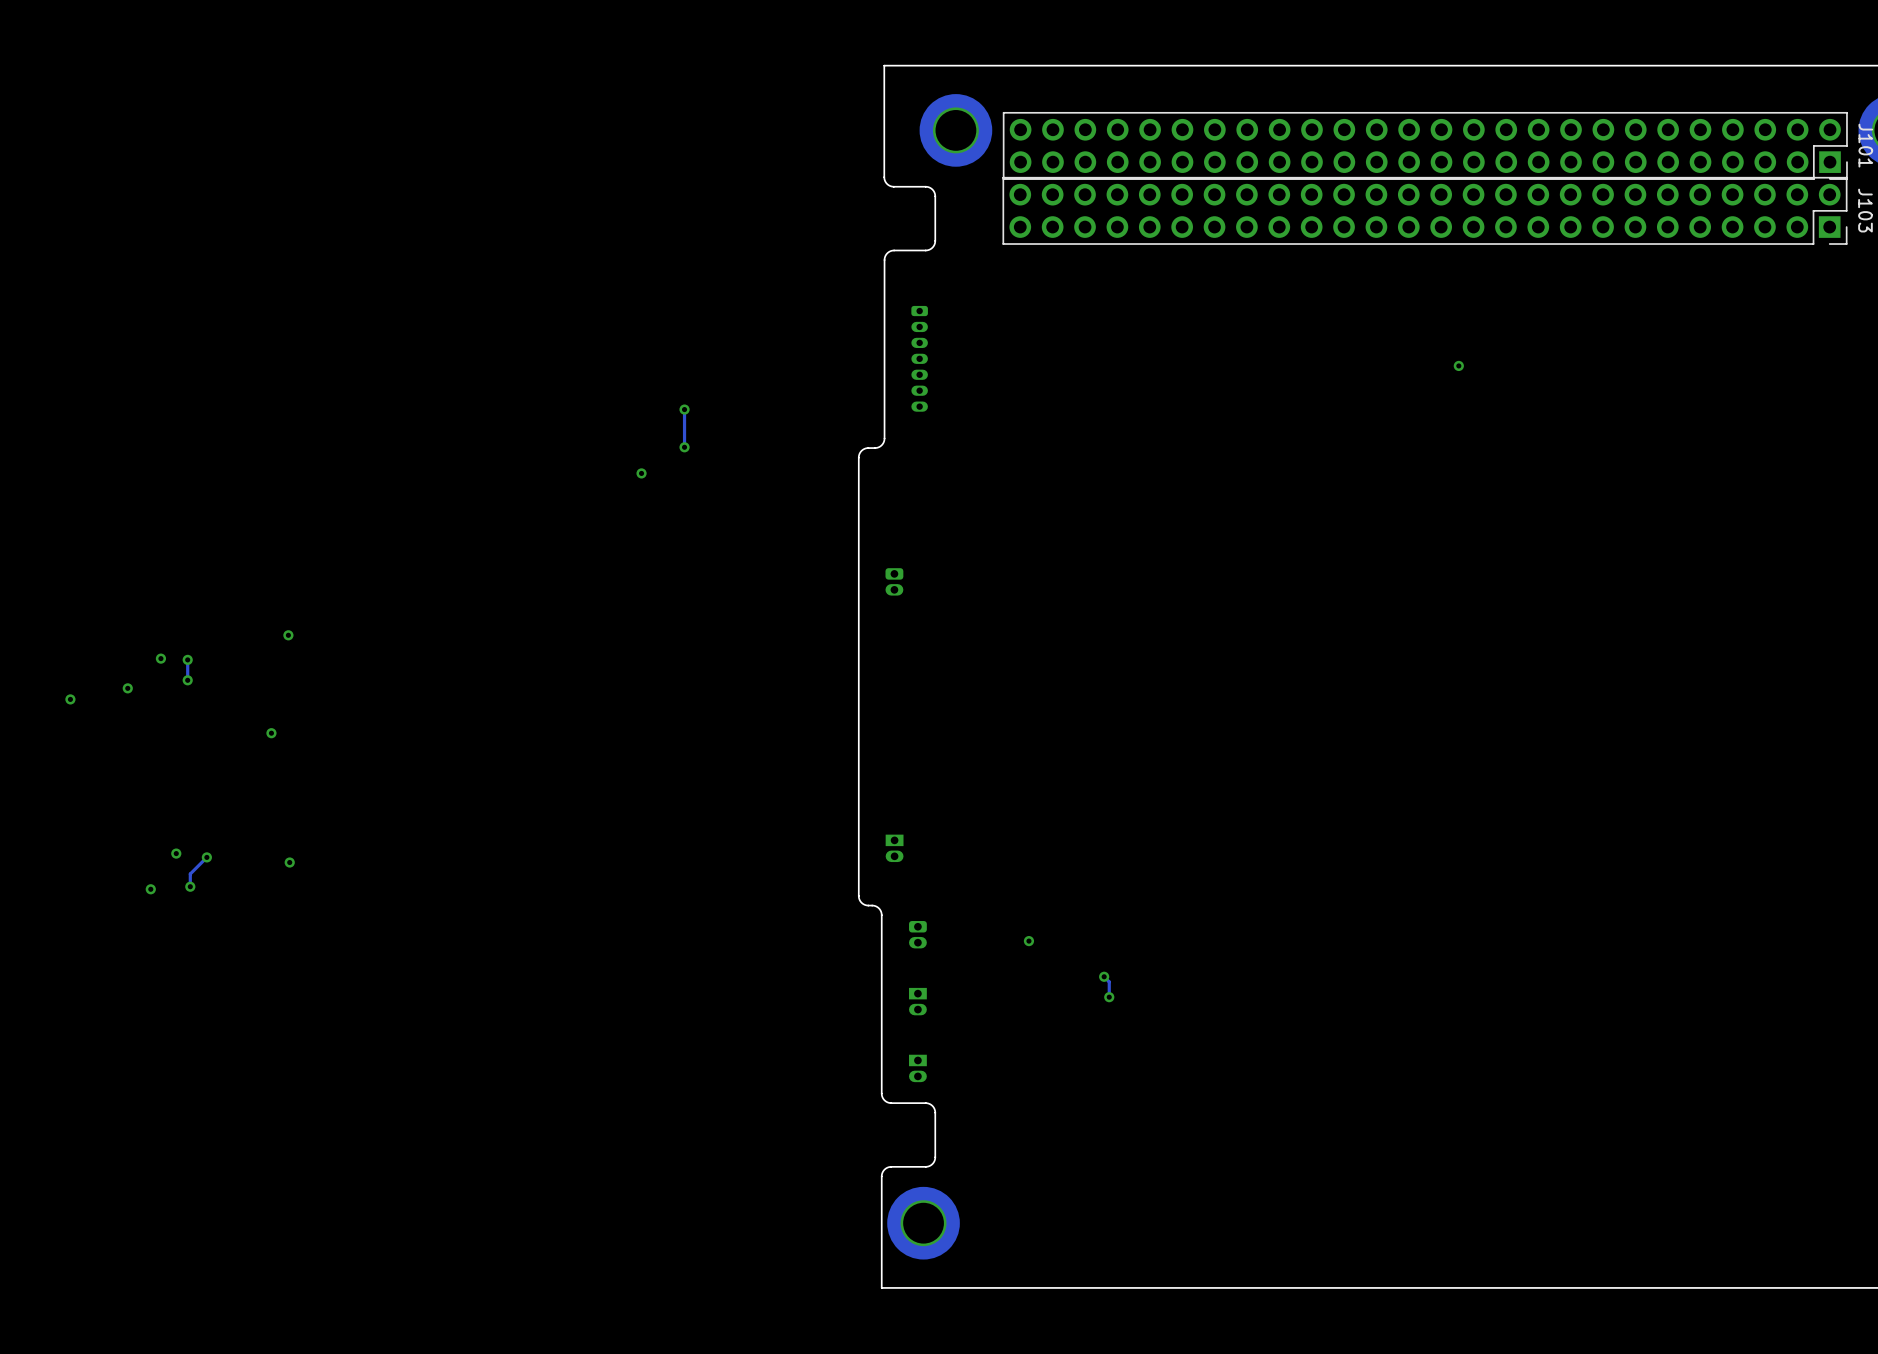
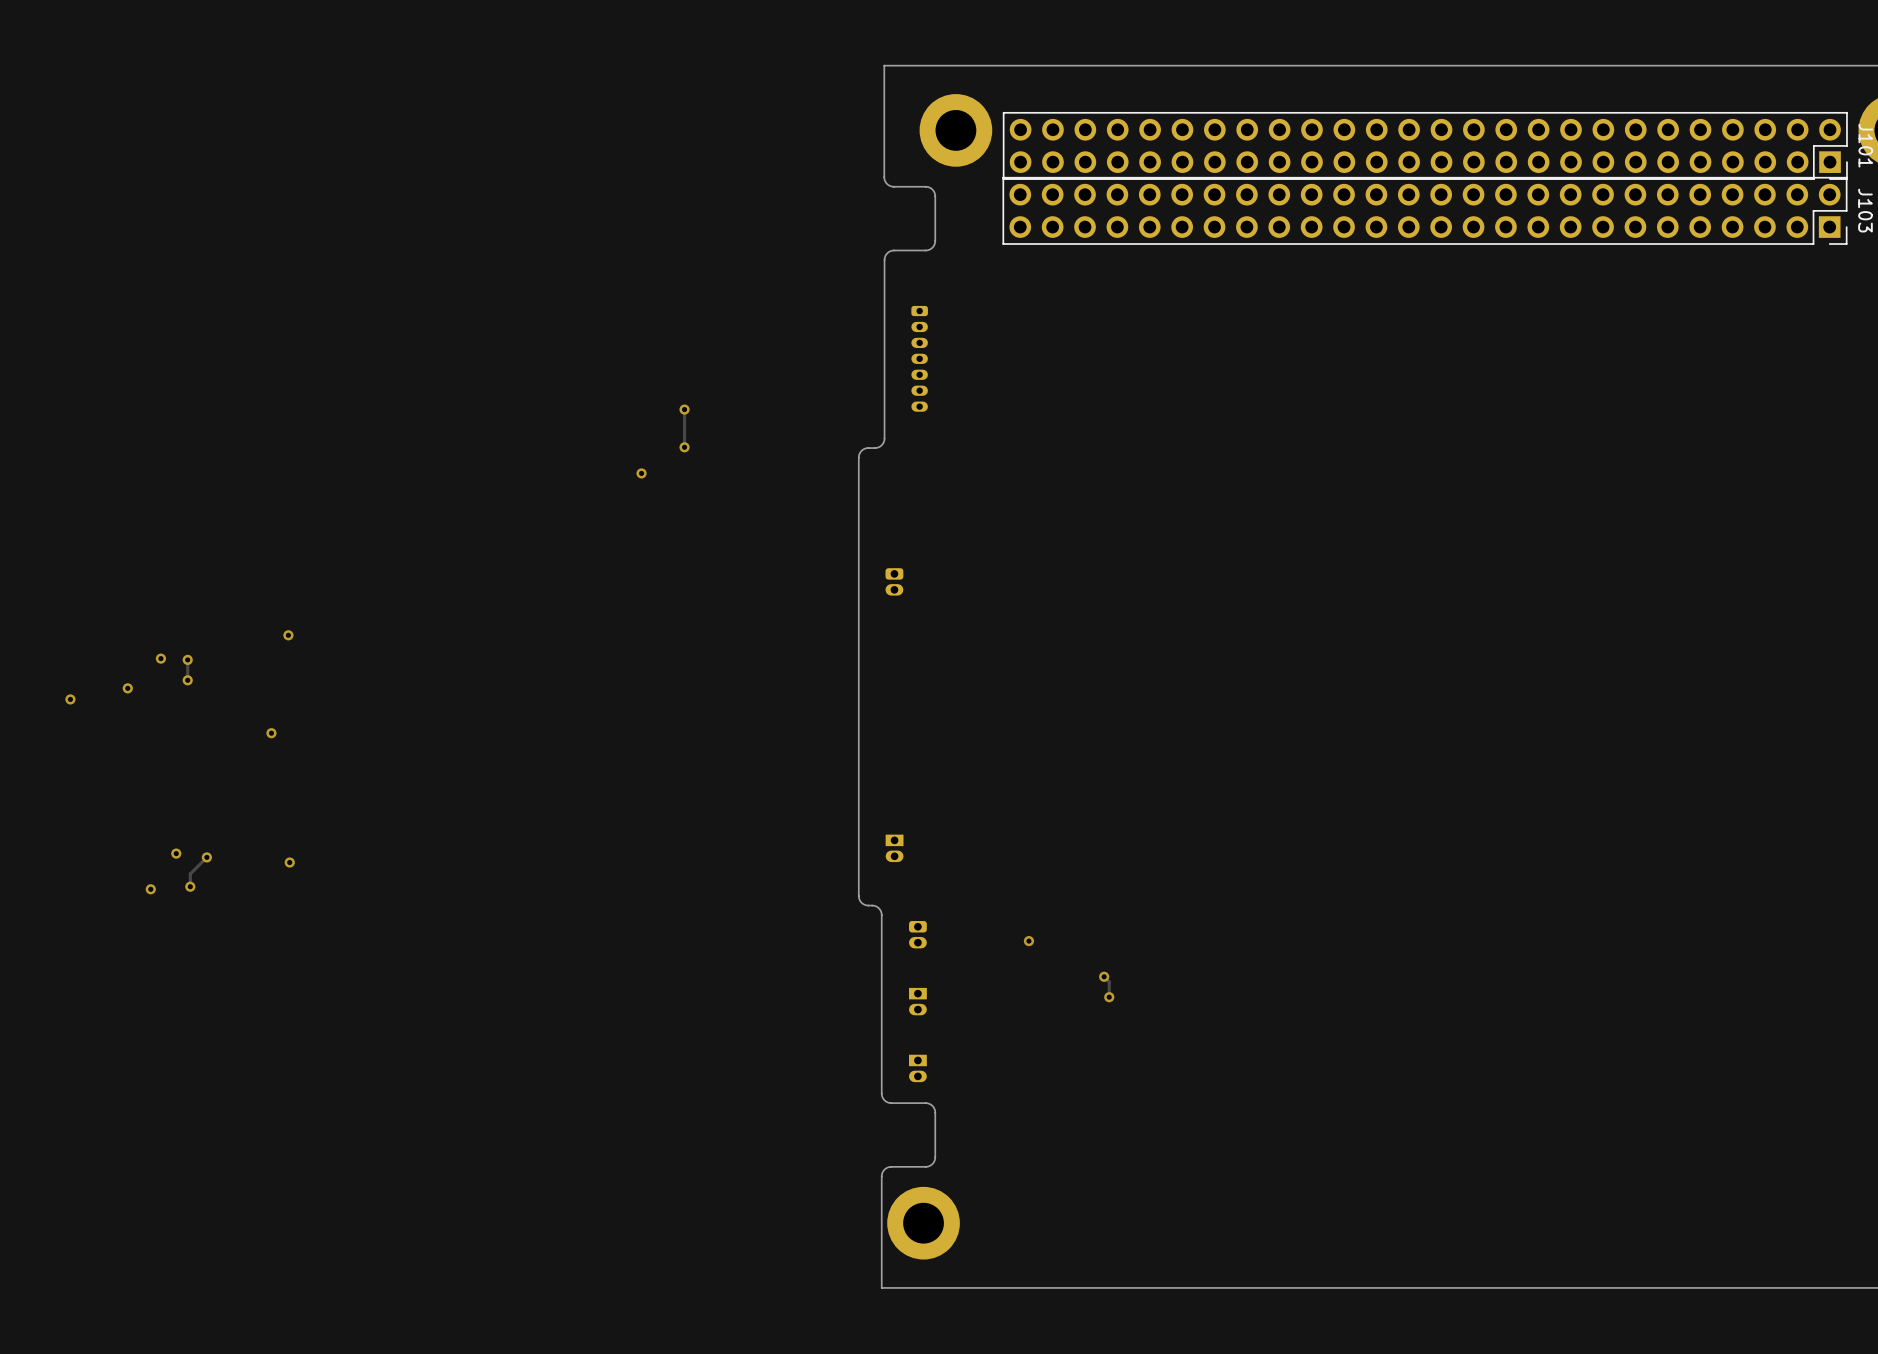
via: (1458, 365) -> none

